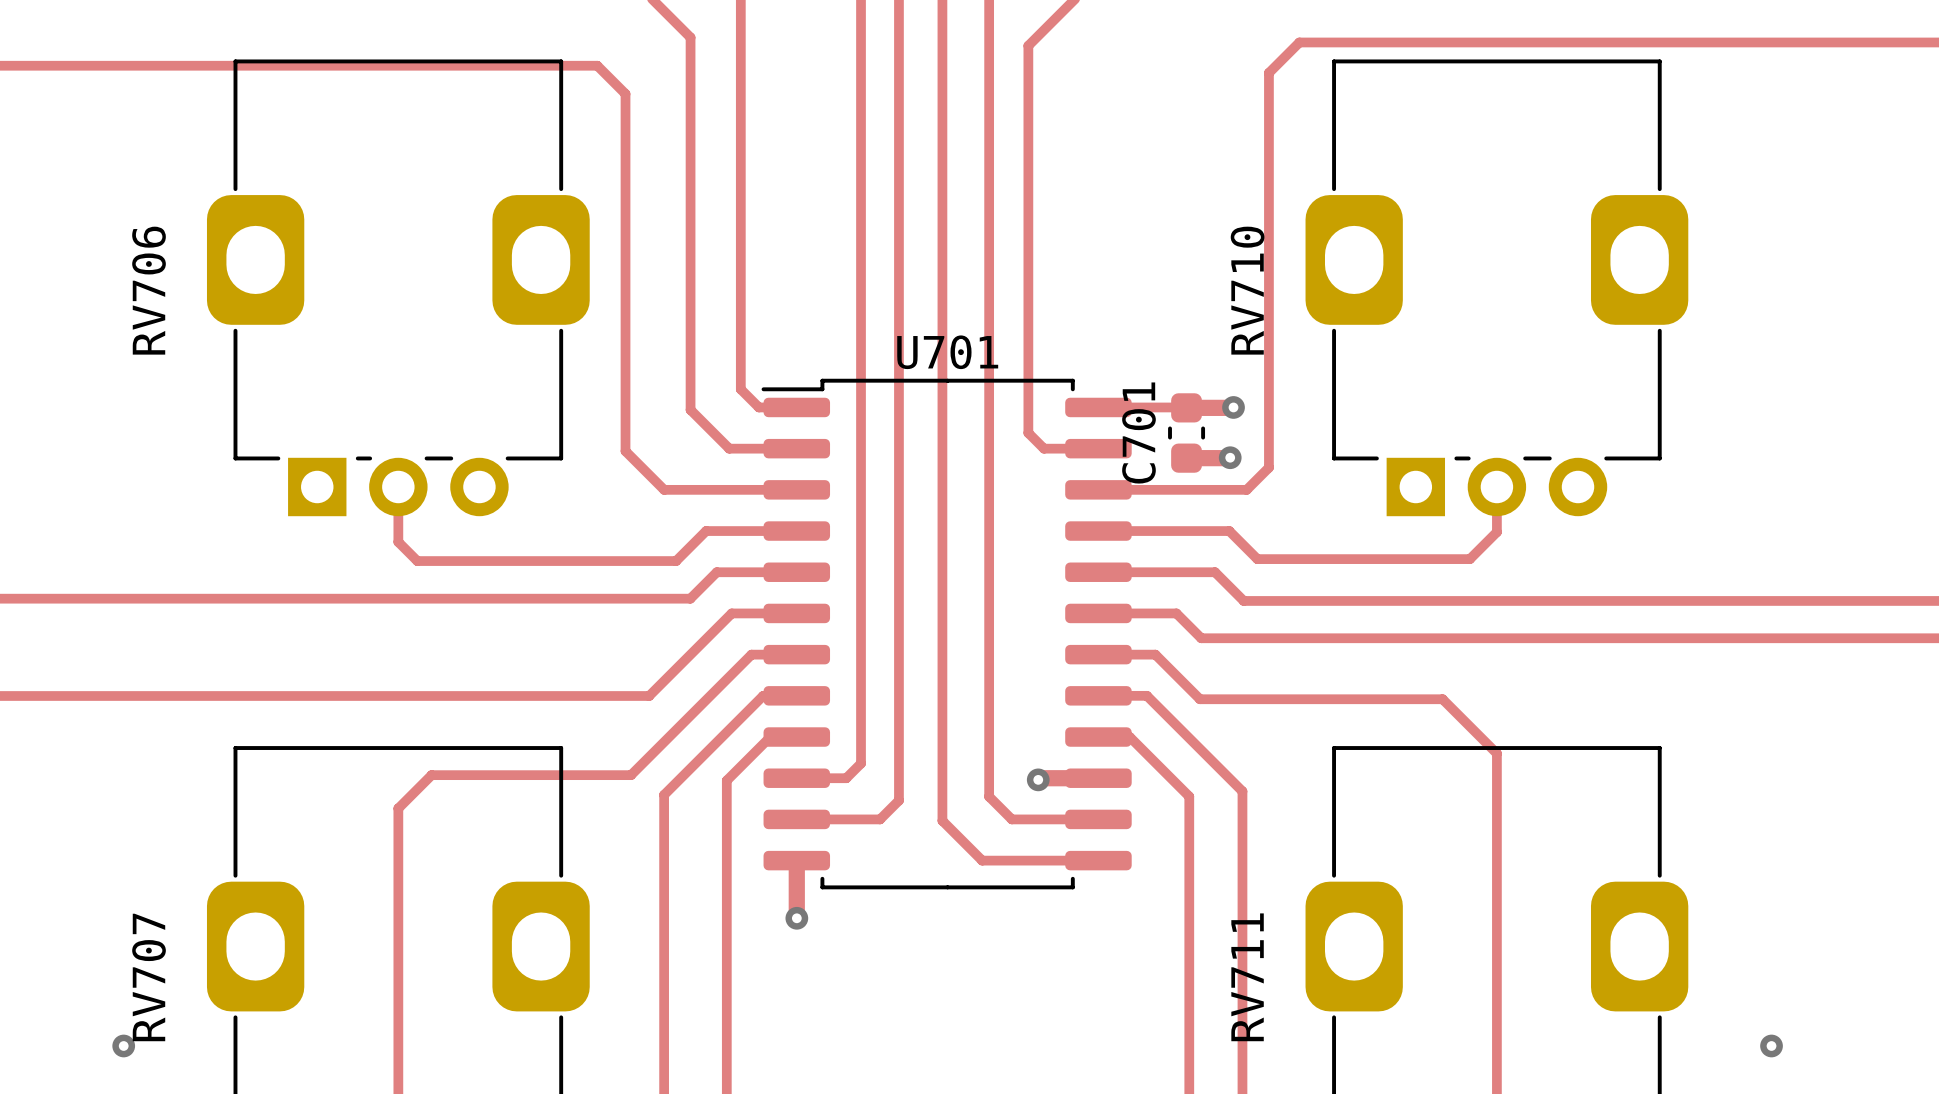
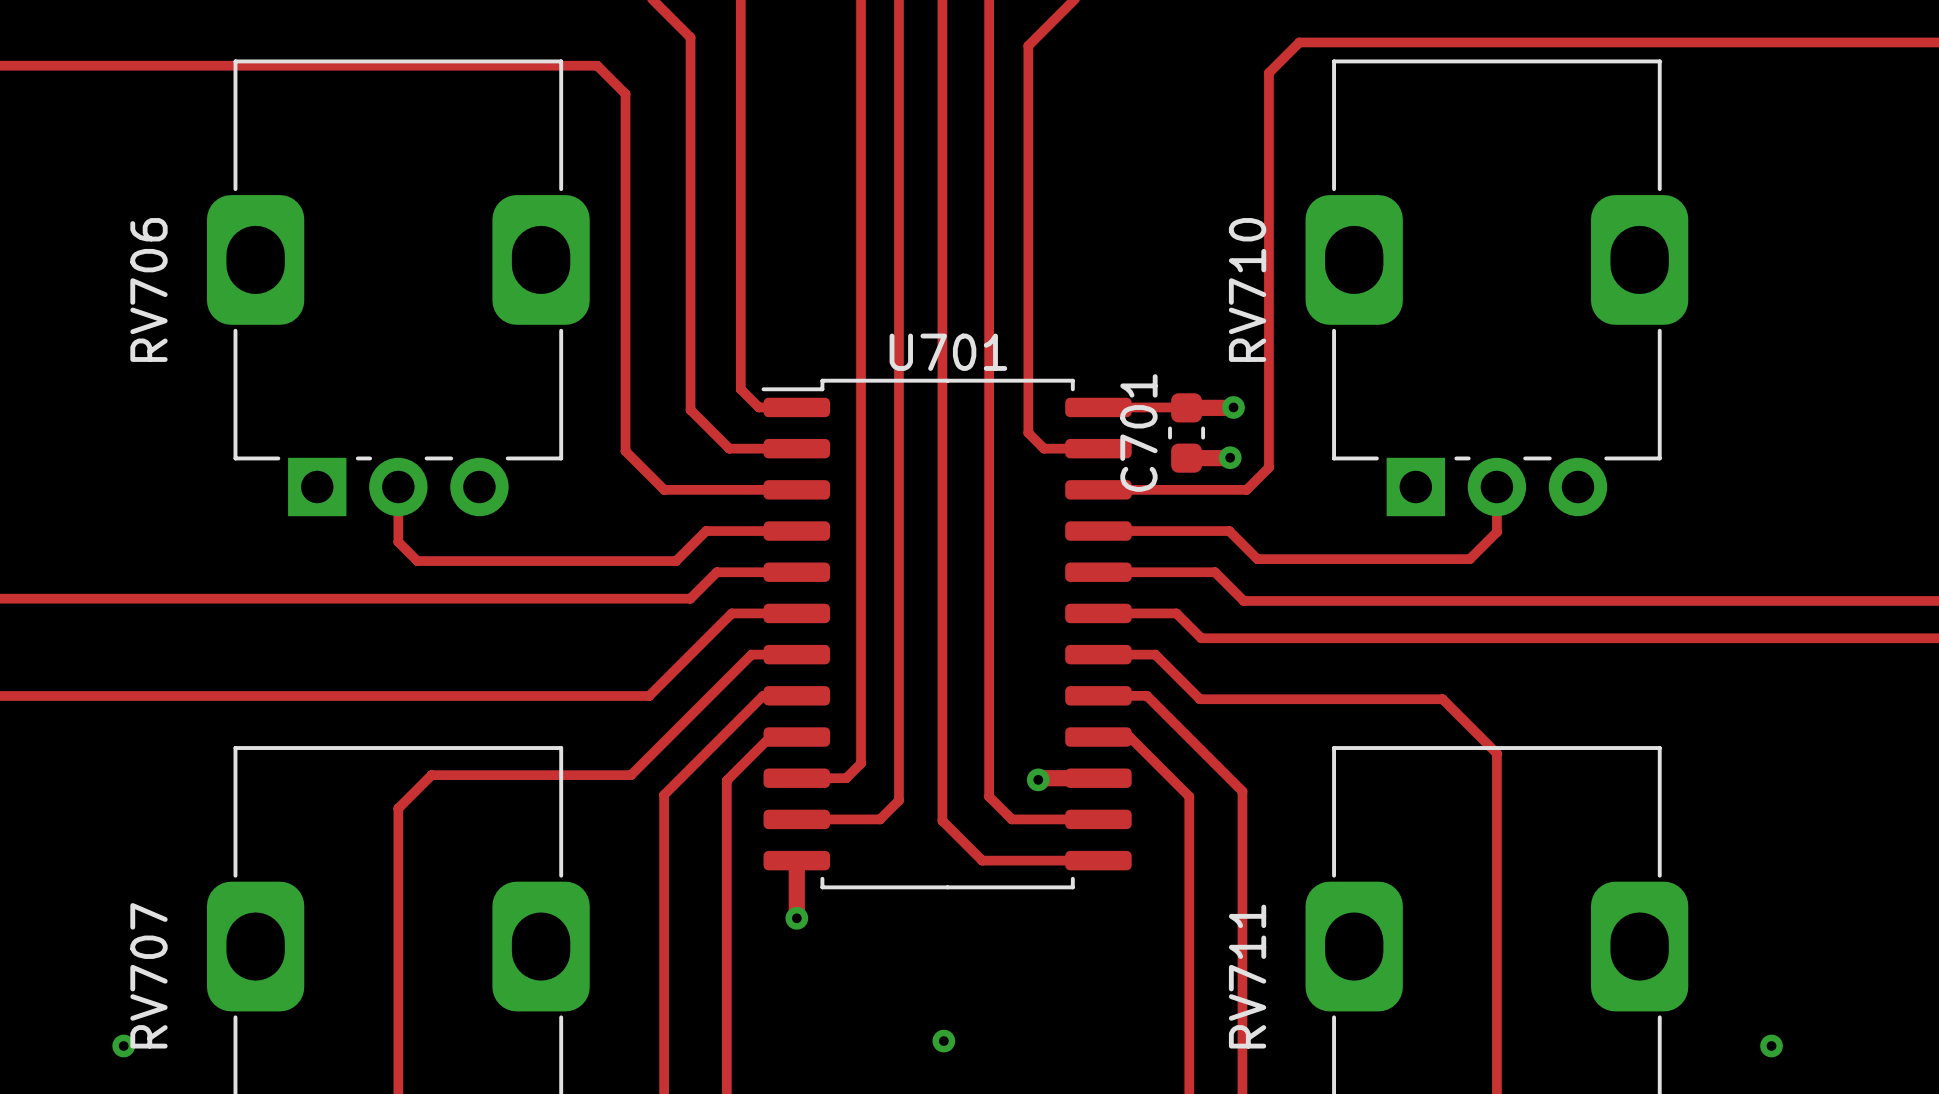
via: none -> (943, 1041)

